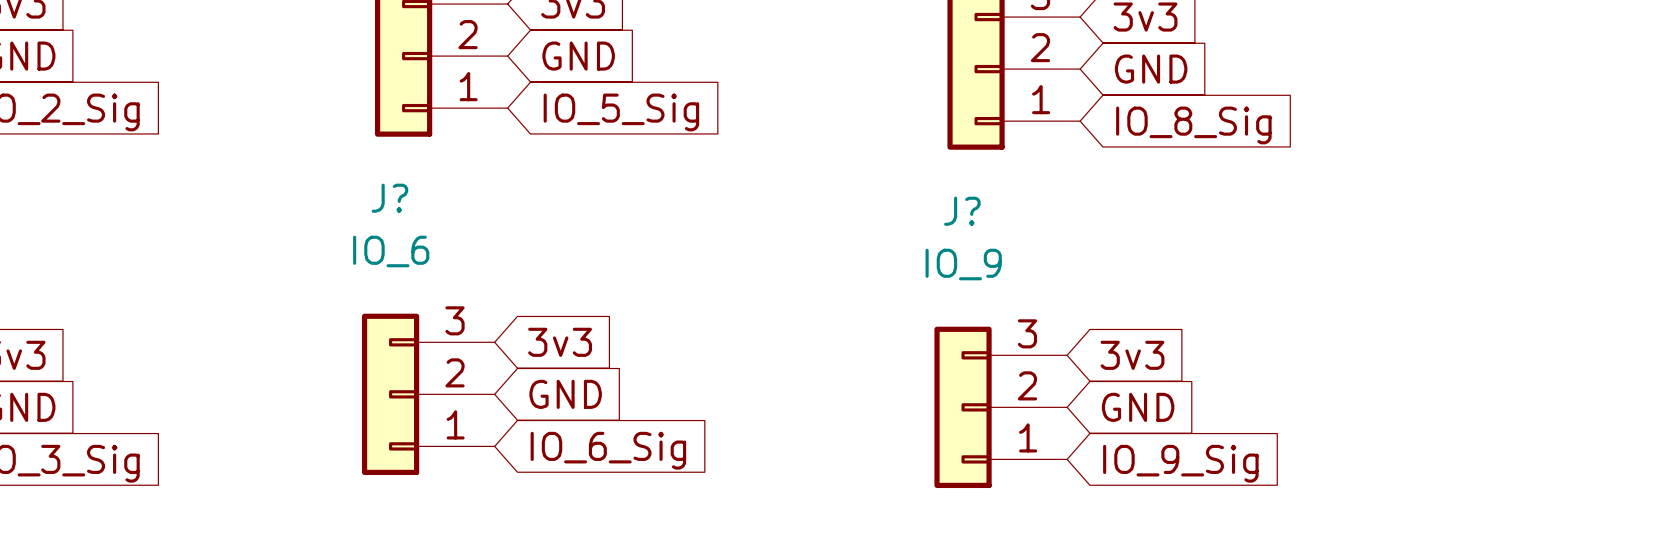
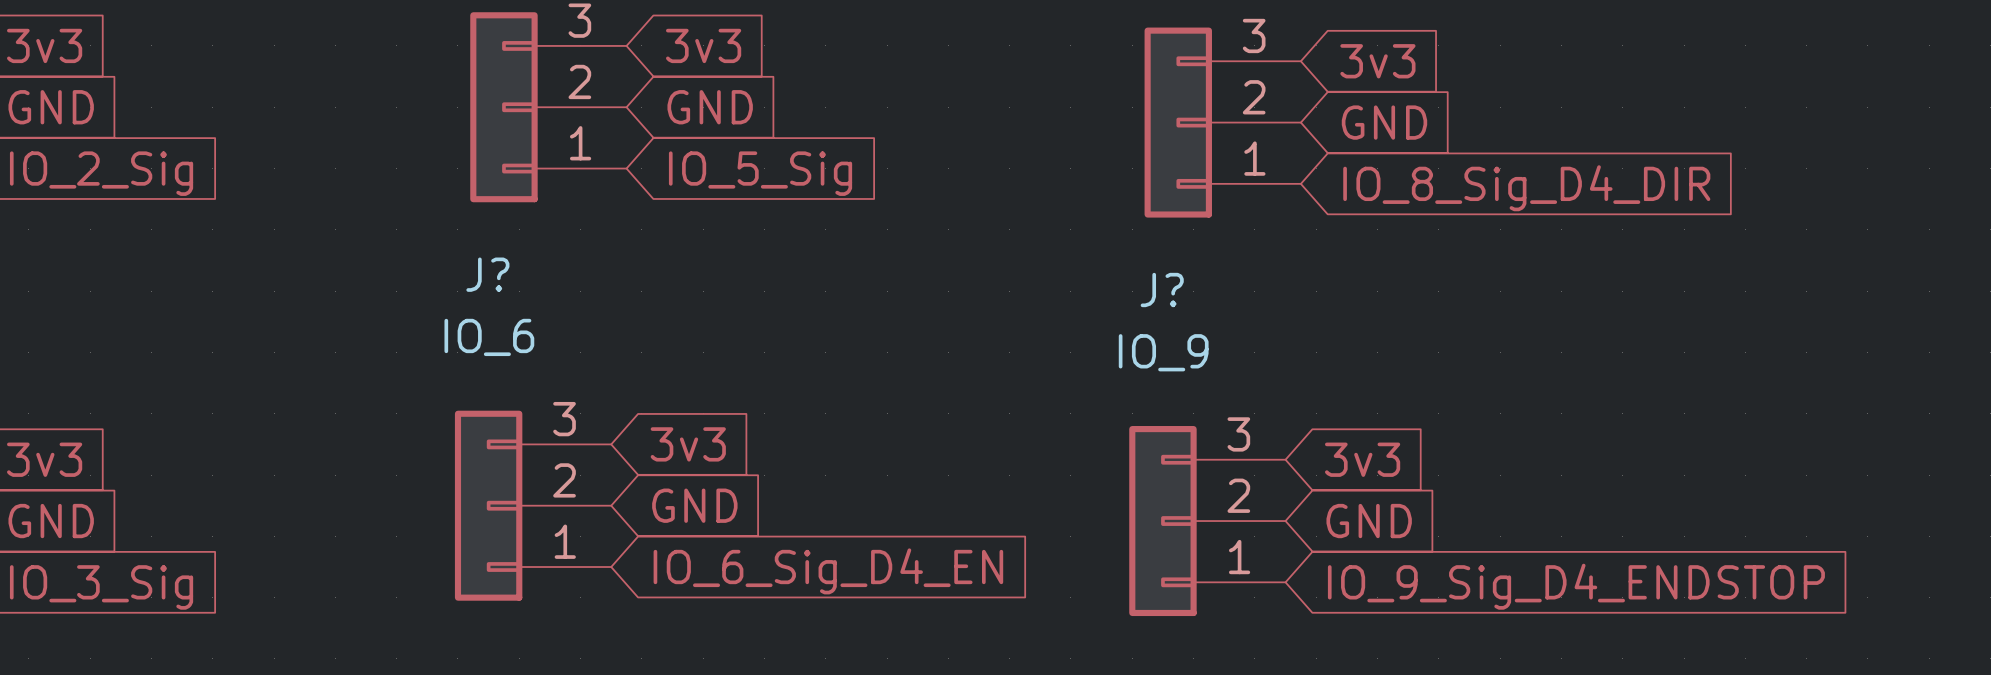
global label: IO_8_Sig (1193, 125) -> IO_8_Sig_D4_DIR (1526, 188)
global label: IO_6_Sig (608, 450) -> IO_6_Sig_D4_EN (828, 571)
global label: IO_9_Sig (1180, 463) -> IO_9_Sig_D4_ENDSTOP (1576, 586)

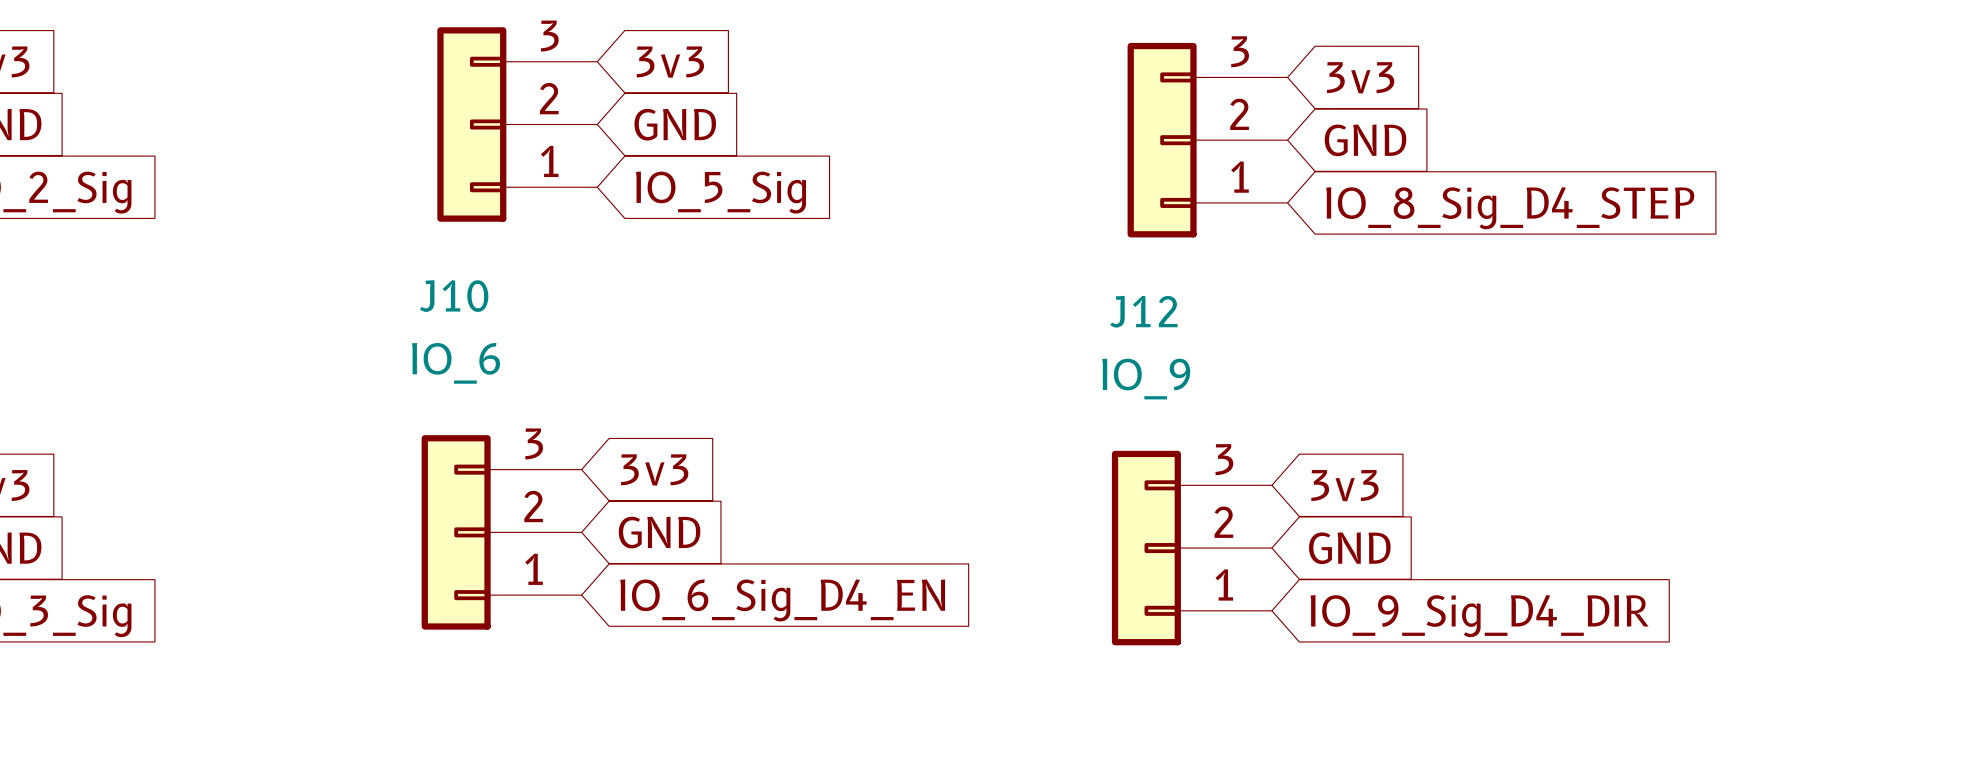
global label: IO_8_Sig_D4_DIR (1526, 188) -> IO_8_Sig_D4_STEP (1510, 208)
J? name: J? (487, 274) -> J10 (454, 296)
J? name: J? (1162, 290) -> J12 (1143, 311)
global label: IO_9_Sig_D4_ENDSTOP (1576, 586) -> IO_9_Sig_D4_DIR (1479, 616)

